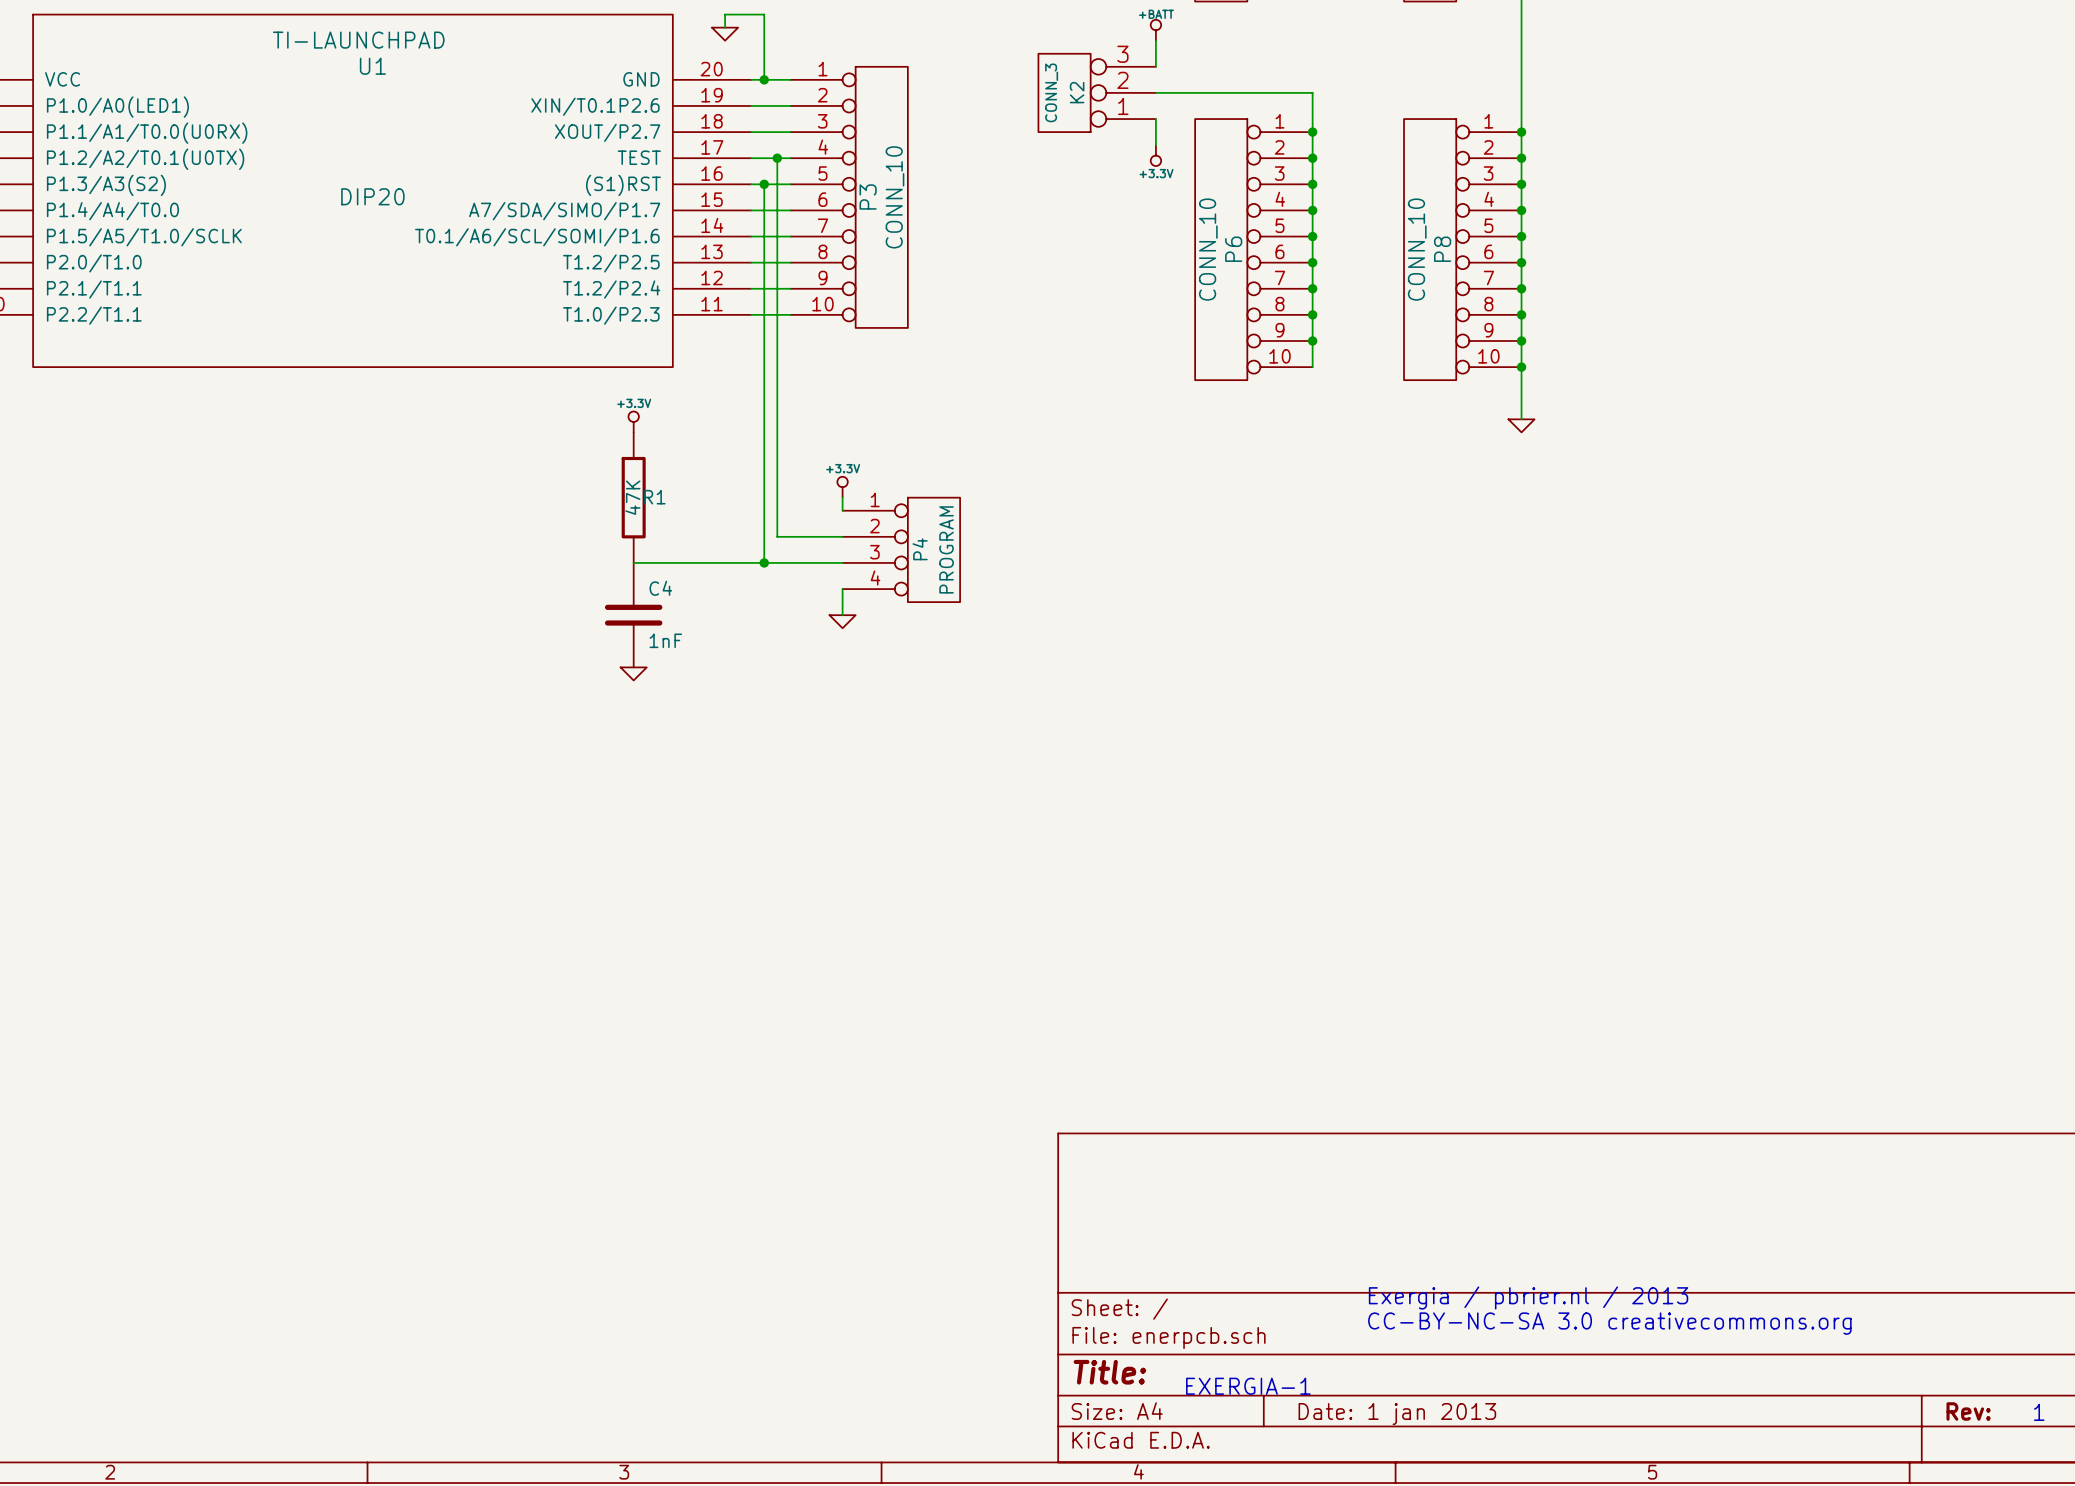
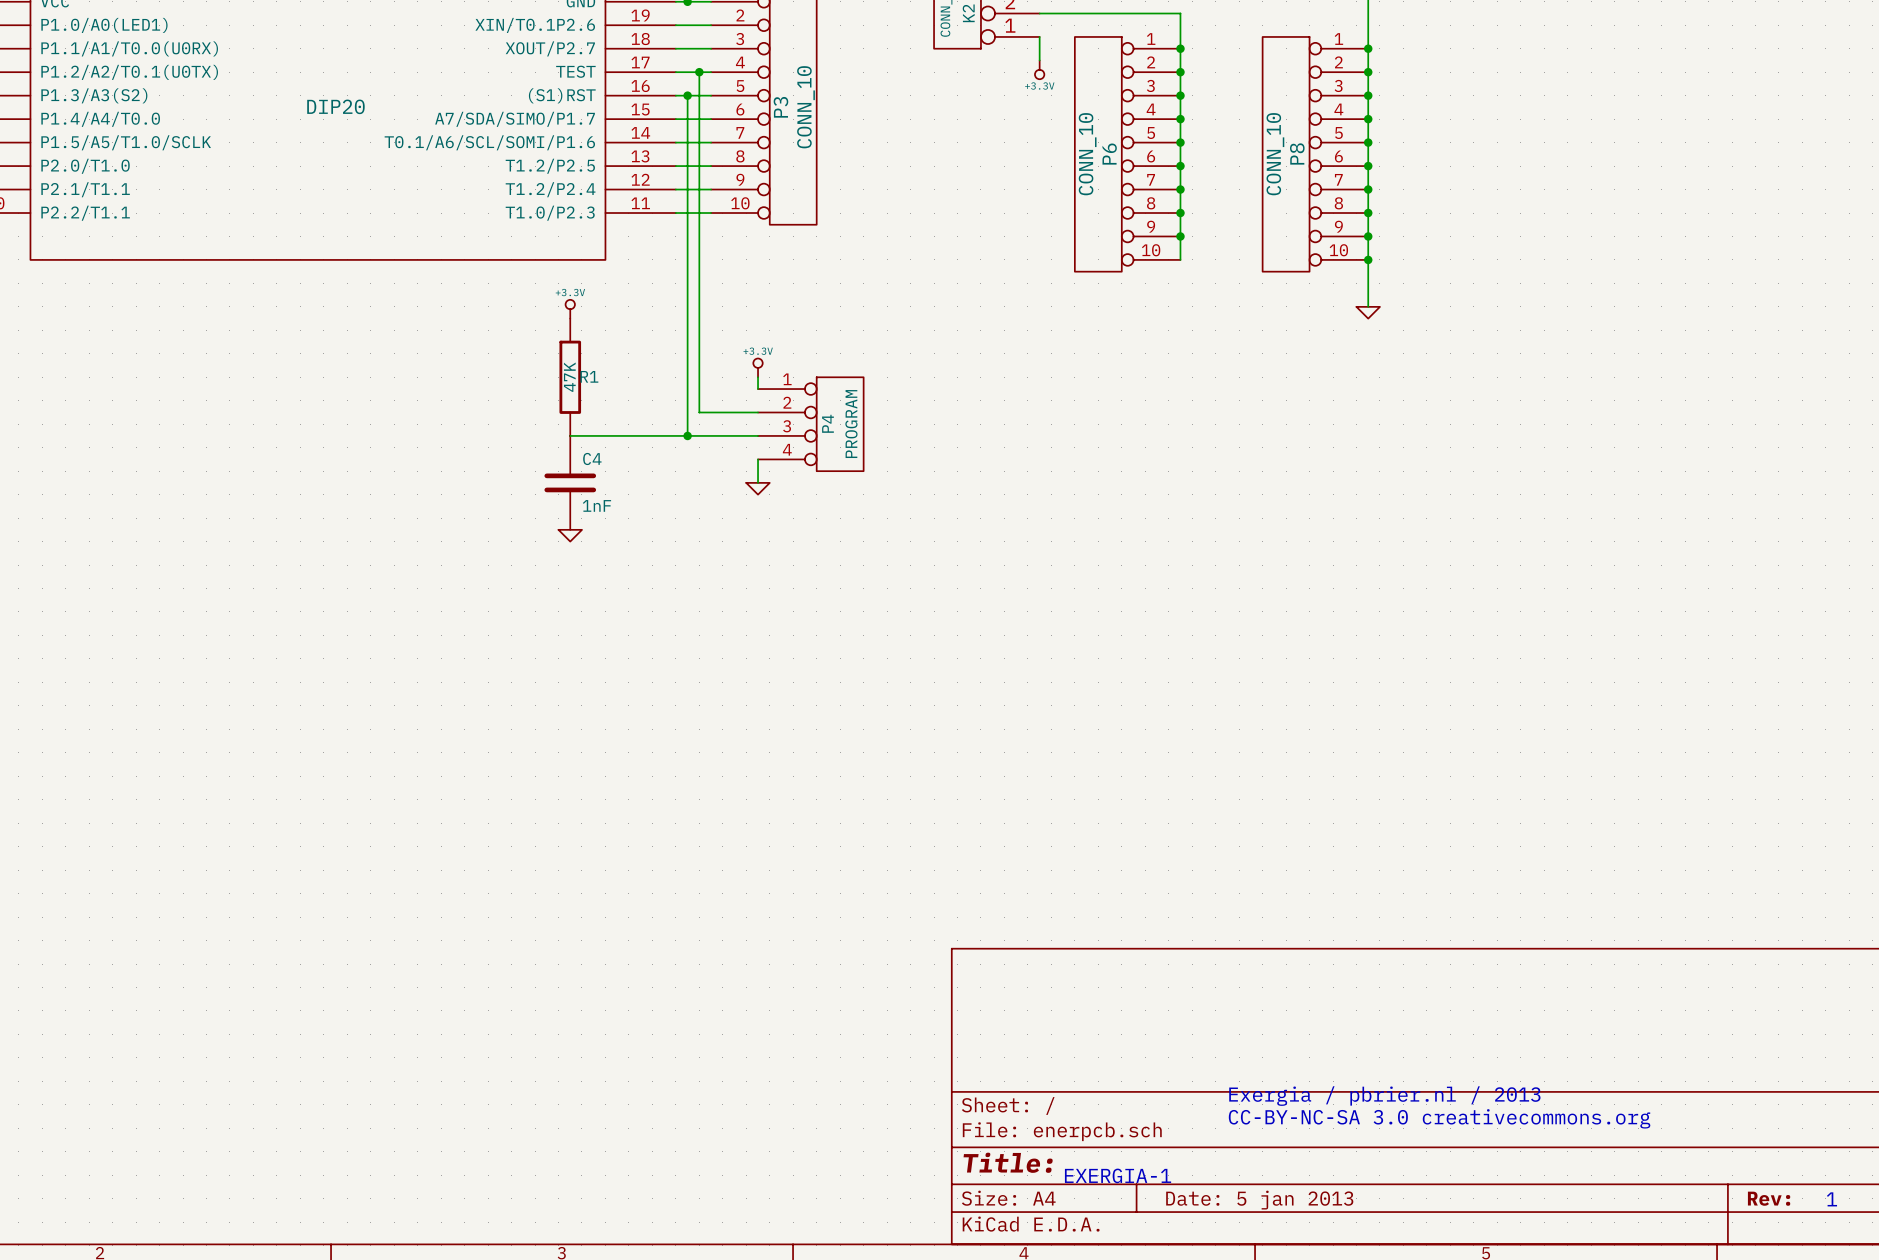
title block: Date: 1 jan 2013 (1397, 1414) -> Date: 5 jan 2013 (1259, 1200)

